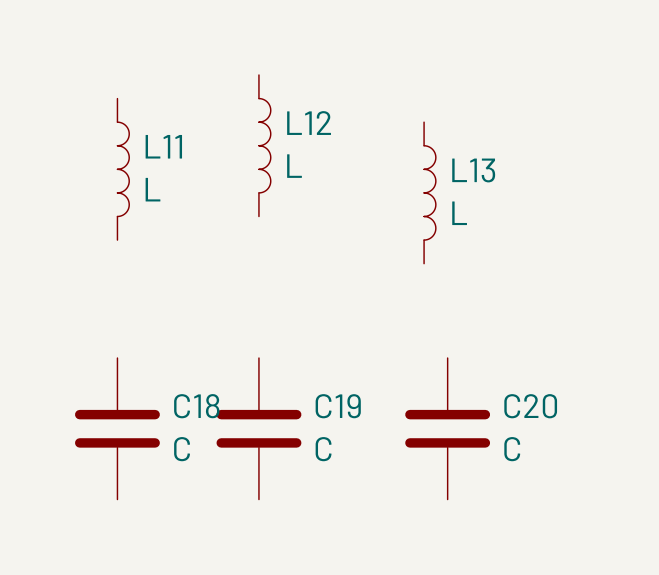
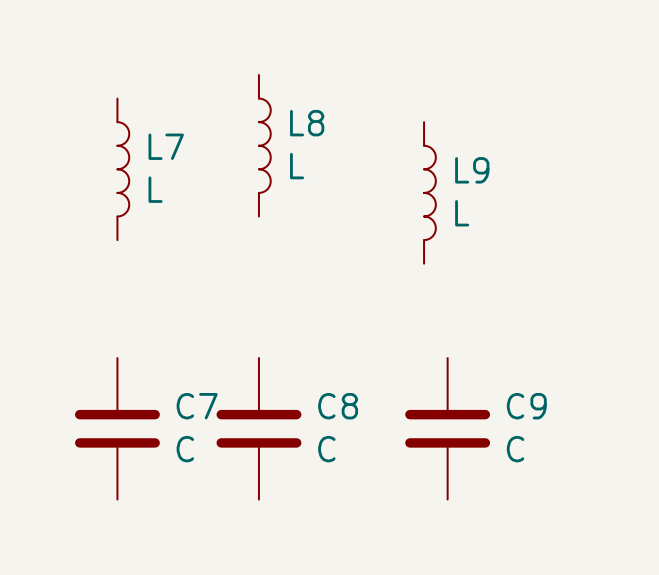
L12 name: L12 (309, 123) -> L8 (307, 123)
L11 name: L11 (163, 146) -> L7 (166, 146)
L13 name: L13 (473, 170) -> L9 (472, 170)
C18 name: C18 (196, 406) -> C7 (197, 406)
C19 name: C19 (338, 406) -> C8 (338, 406)
C20 name: C20 (530, 406) -> C9 (526, 406)

